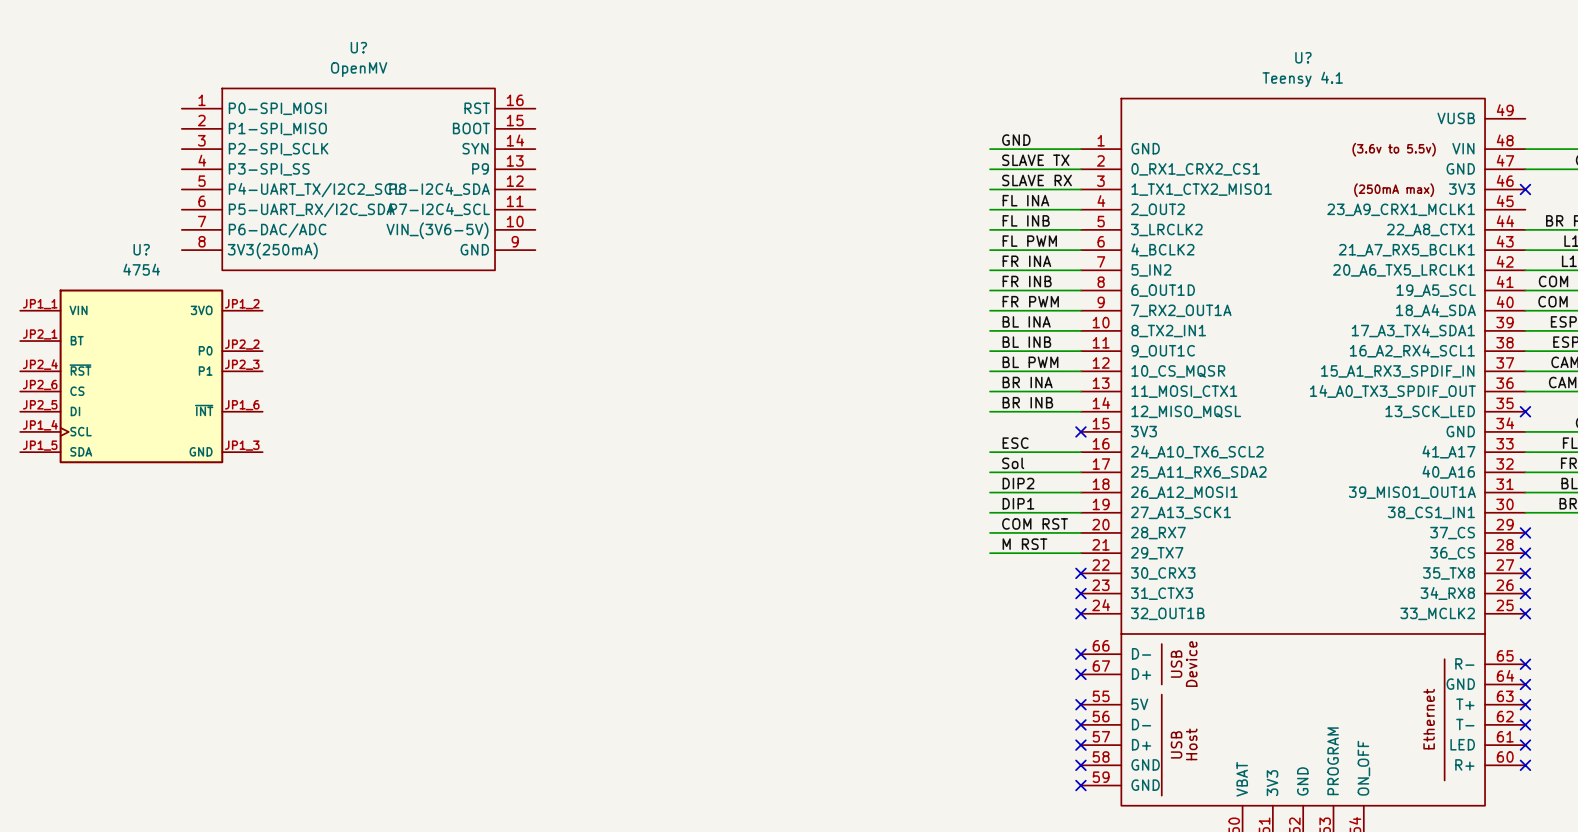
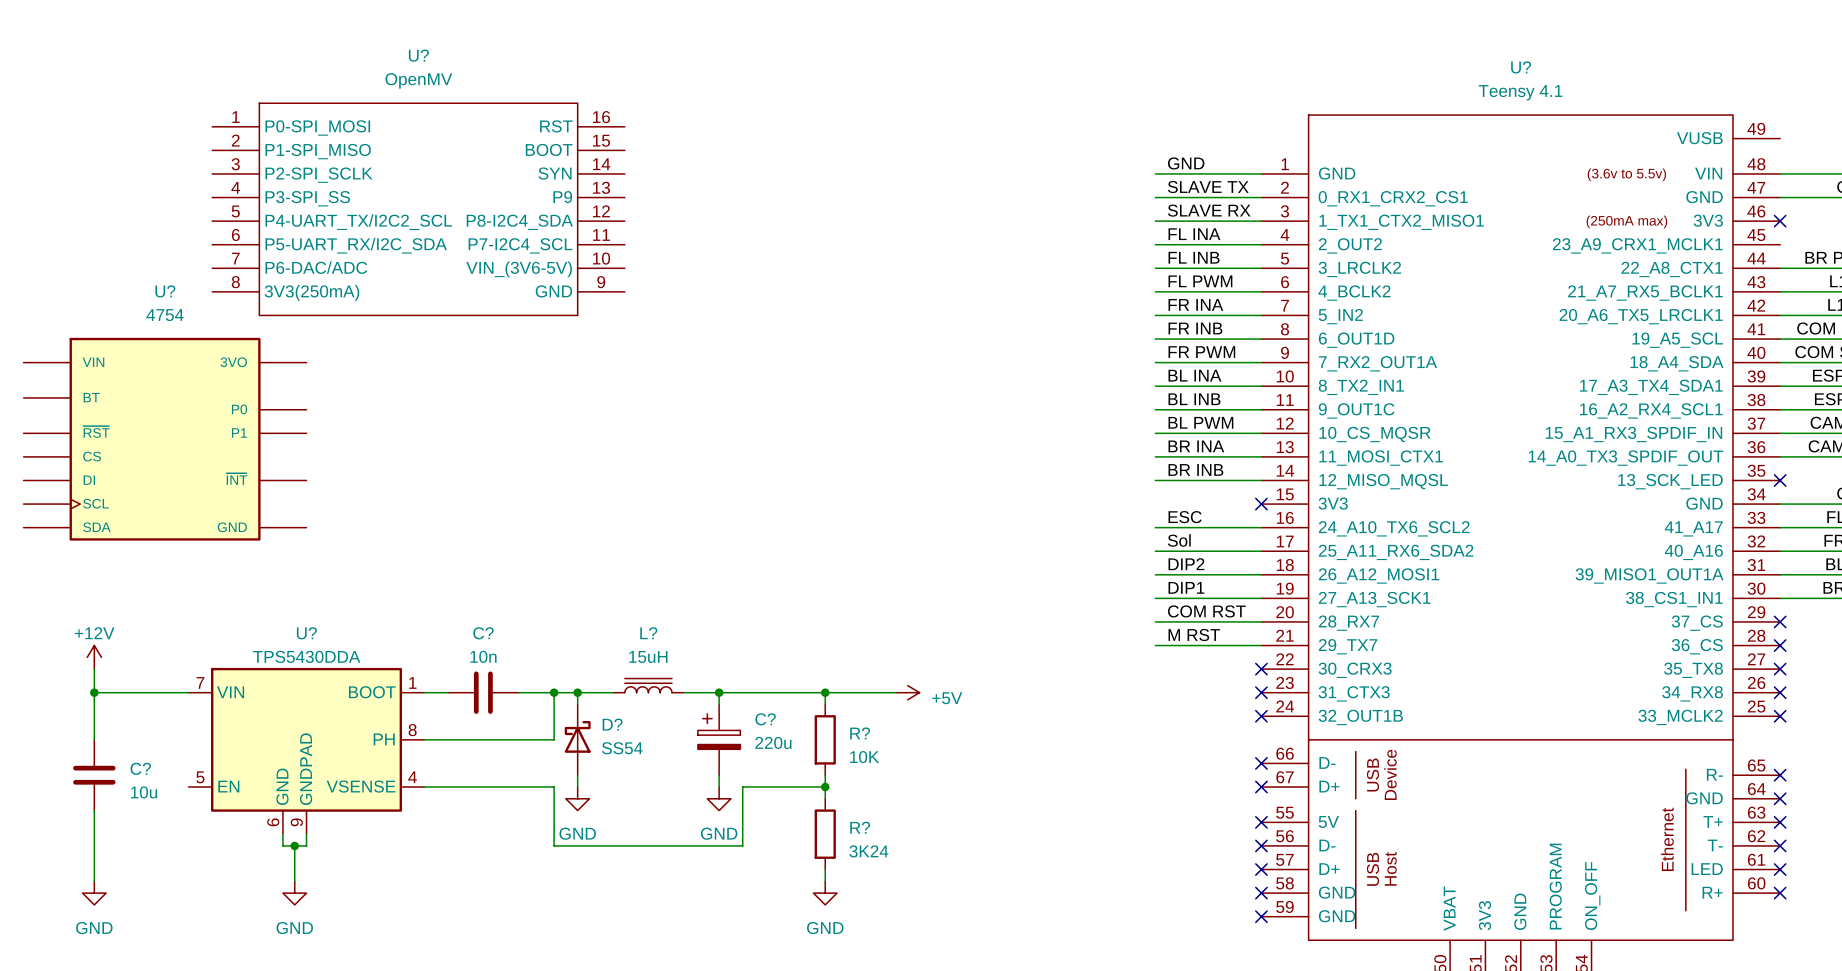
U? symbol: [20, 289, 263, 464] -> [23, 337, 307, 541]
power symbol: none -> +12V (94, 657)
wire: none -> (94, 669) (94, 739)
L?: none -> 15uH (648, 685)
wire: none -> (94, 692) (188, 692)
junction: none -> (94, 692)
wire: none -> (424, 692) (447, 692)
C?: none -> 10n (483, 692)
wire: none -> (518, 692) (613, 692)
wire: none -> (554, 692) (554, 739) (424, 739)
junction: none -> (554, 692)
wire: none -> (577, 692) (577, 704)
junction: none -> (577, 692)
wire: none -> (683, 692) (895, 692)
wire: none -> (719, 692) (719, 704)
junction: none -> (719, 692)
wire: none -> (825, 692) (825, 704)
junction: none -> (825, 692)
power symbol: none -> +5V (907, 692)
D?: none -> SS54 (577, 739)
C?: none -> 220u (719, 739)
R?: none -> 10K (825, 739)
U?: none -> TPS5430DDA (306, 751)
C?: none -> 10u (94, 775)
wire: none -> (577, 775) (577, 787)
wire: none -> (719, 775) (719, 787)
wire: none -> (825, 775) (825, 798)
wire: none -> (424, 787) (554, 787) (554, 845) (742, 845) (742, 787) (825, 787)
junction: none -> (825, 787)
power symbol: none -> GND (577, 798)
power symbol: none -> GND (719, 798)
wire: none -> (94, 810) (94, 881)
wire: none -> (282, 834) (282, 845) (306, 845) (306, 834)
R?: none -> 3K24 (825, 834)
wire: none -> (294, 845) (294, 881)
junction: none -> (294, 845)
wire: none -> (825, 869) (825, 881)
power symbol: none -> GND (94, 893)
power symbol: none -> GND (294, 893)
power symbol: none -> GND (825, 893)

